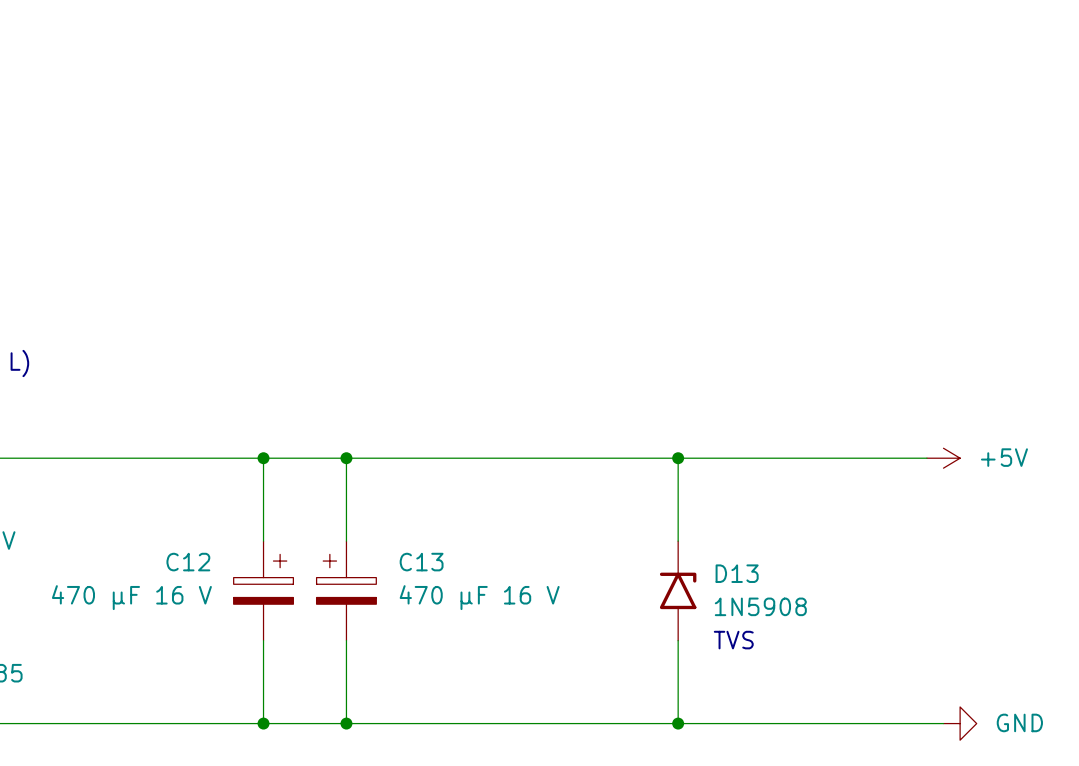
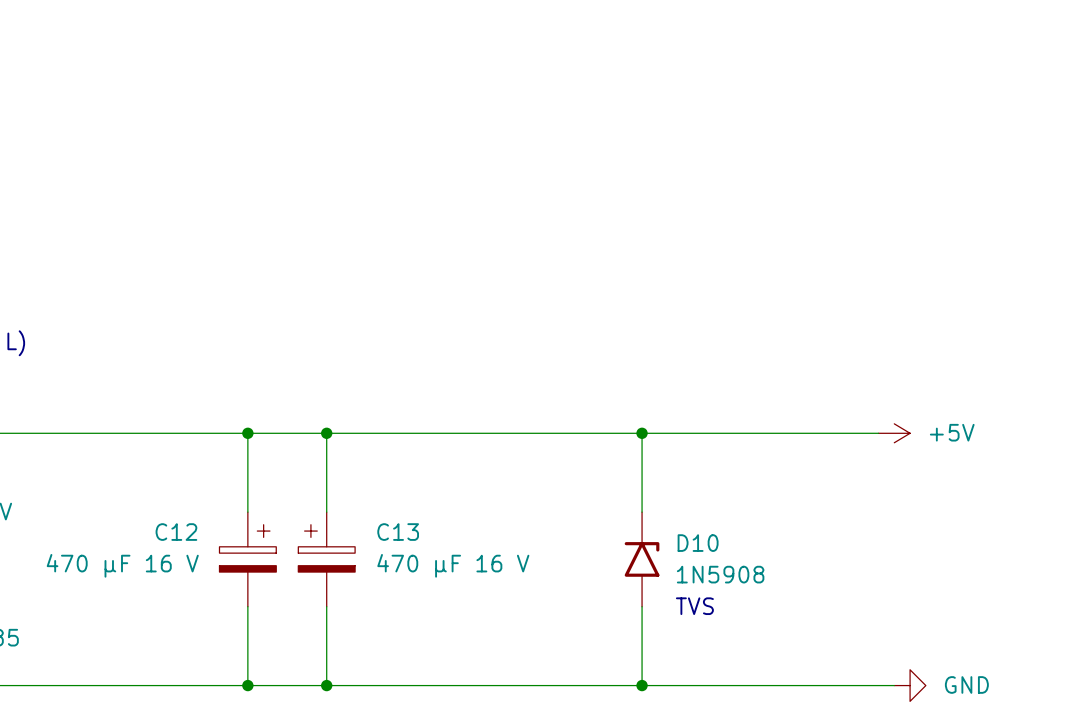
D13 name: D13 (737, 573) -> D10 (698, 543)

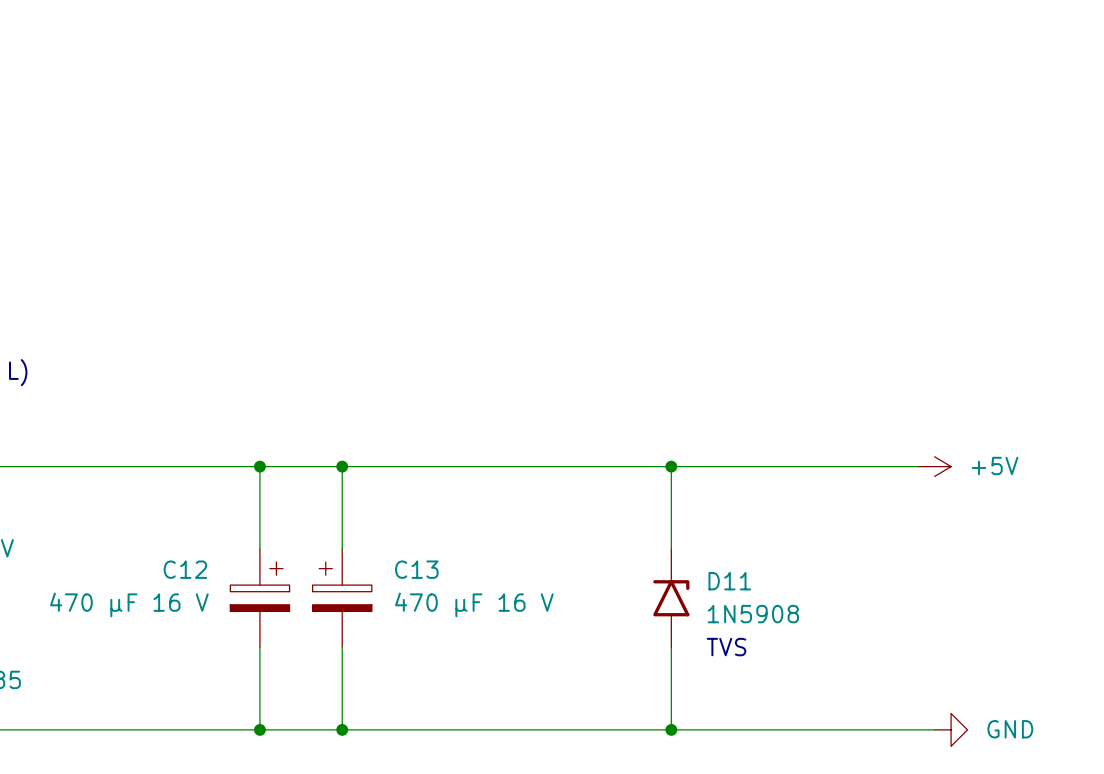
D10 name: D10 (698, 543) -> D11 (729, 581)

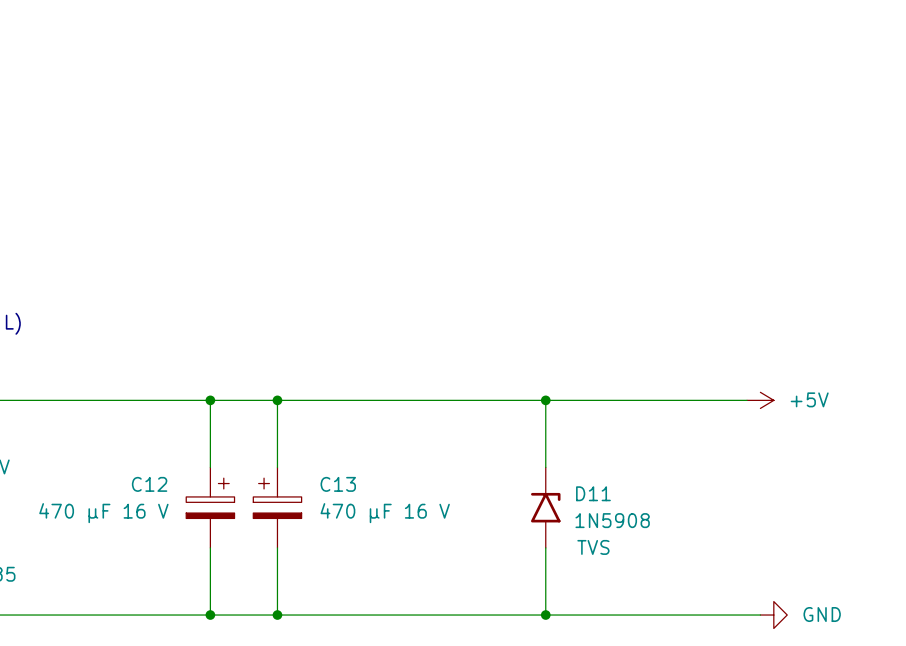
text: TVS (726, 647) -> none
D11 text: none -> TVS (593, 547)

